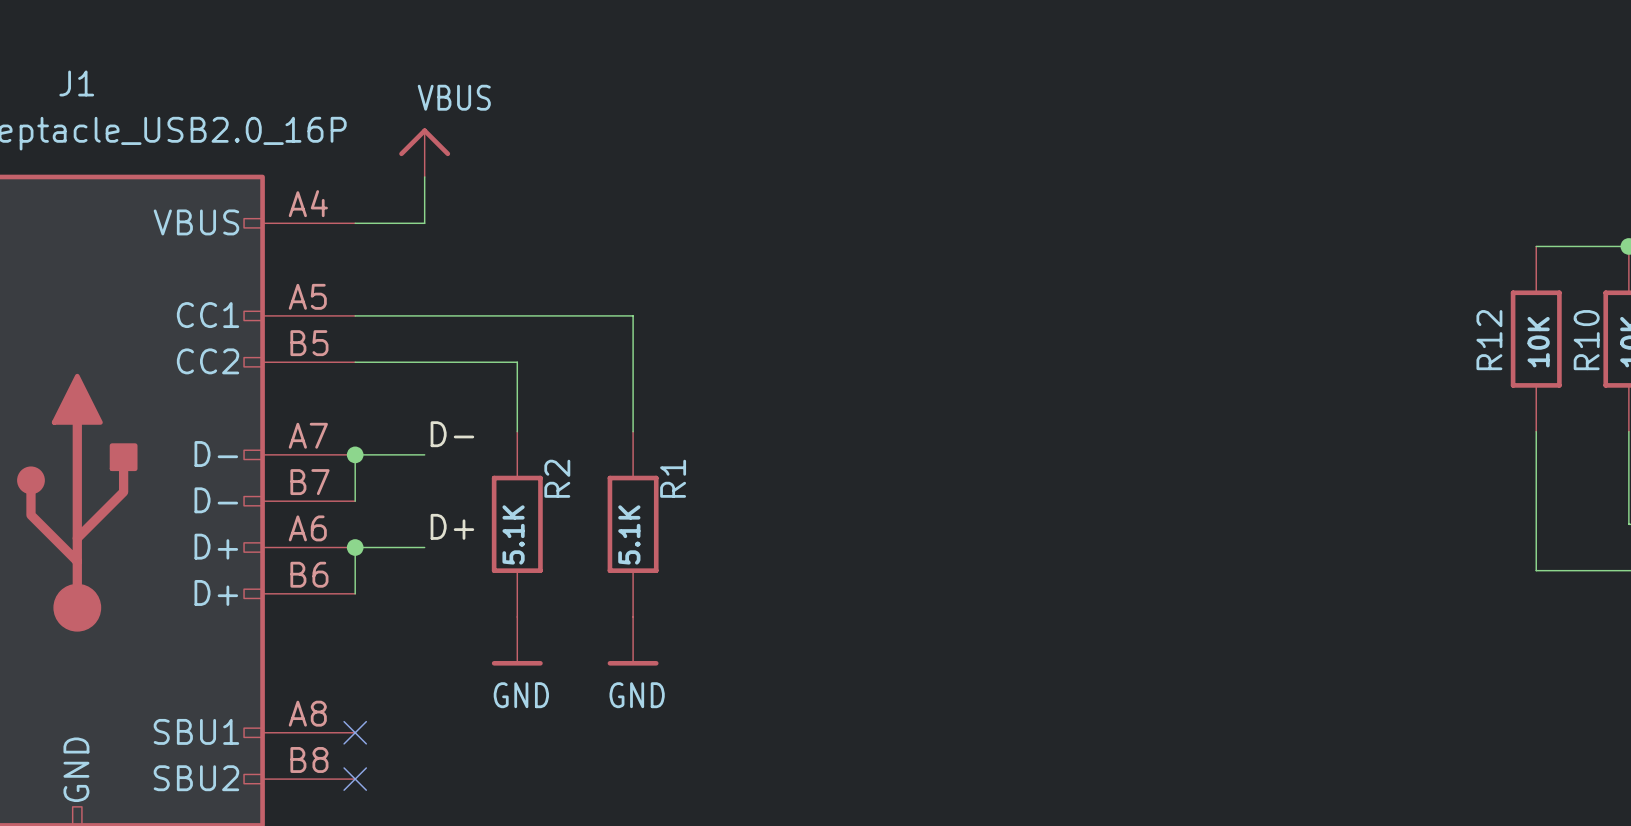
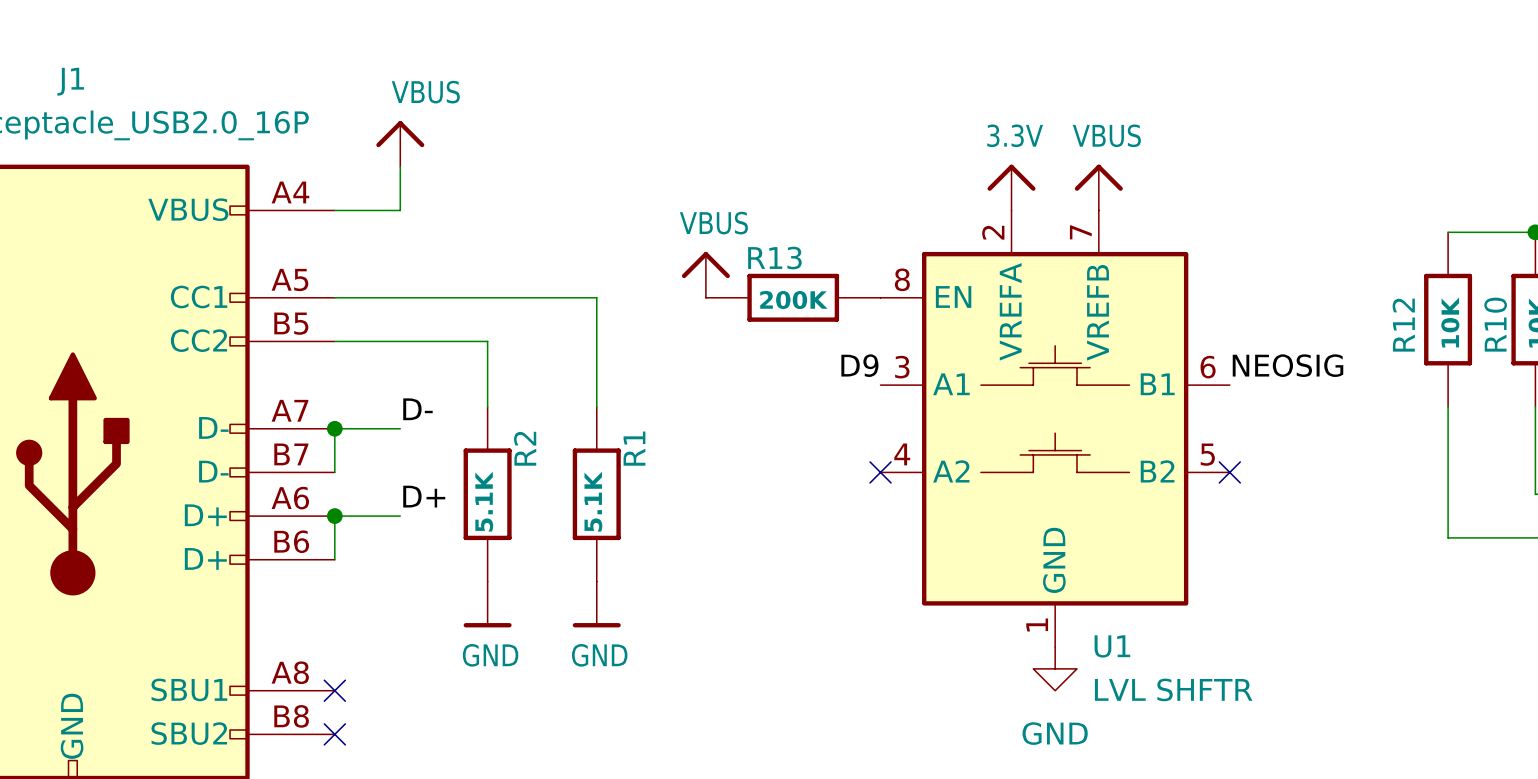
power symbol: none -> 3.3V (1011, 187)
power symbol: none -> VBUS (1098, 187)
power symbol: none -> VBUS (705, 274)
R13: none -> 200K (793, 297)
label: none -> D9 (859, 365)
label: none -> NEOSIG (1288, 365)
U1: none -> LVL SHFTR (1055, 428)
no-connect mark: none -> (880, 472)
no-connect mark: none -> (1229, 472)
power symbol: none -> GND (1055, 668)

